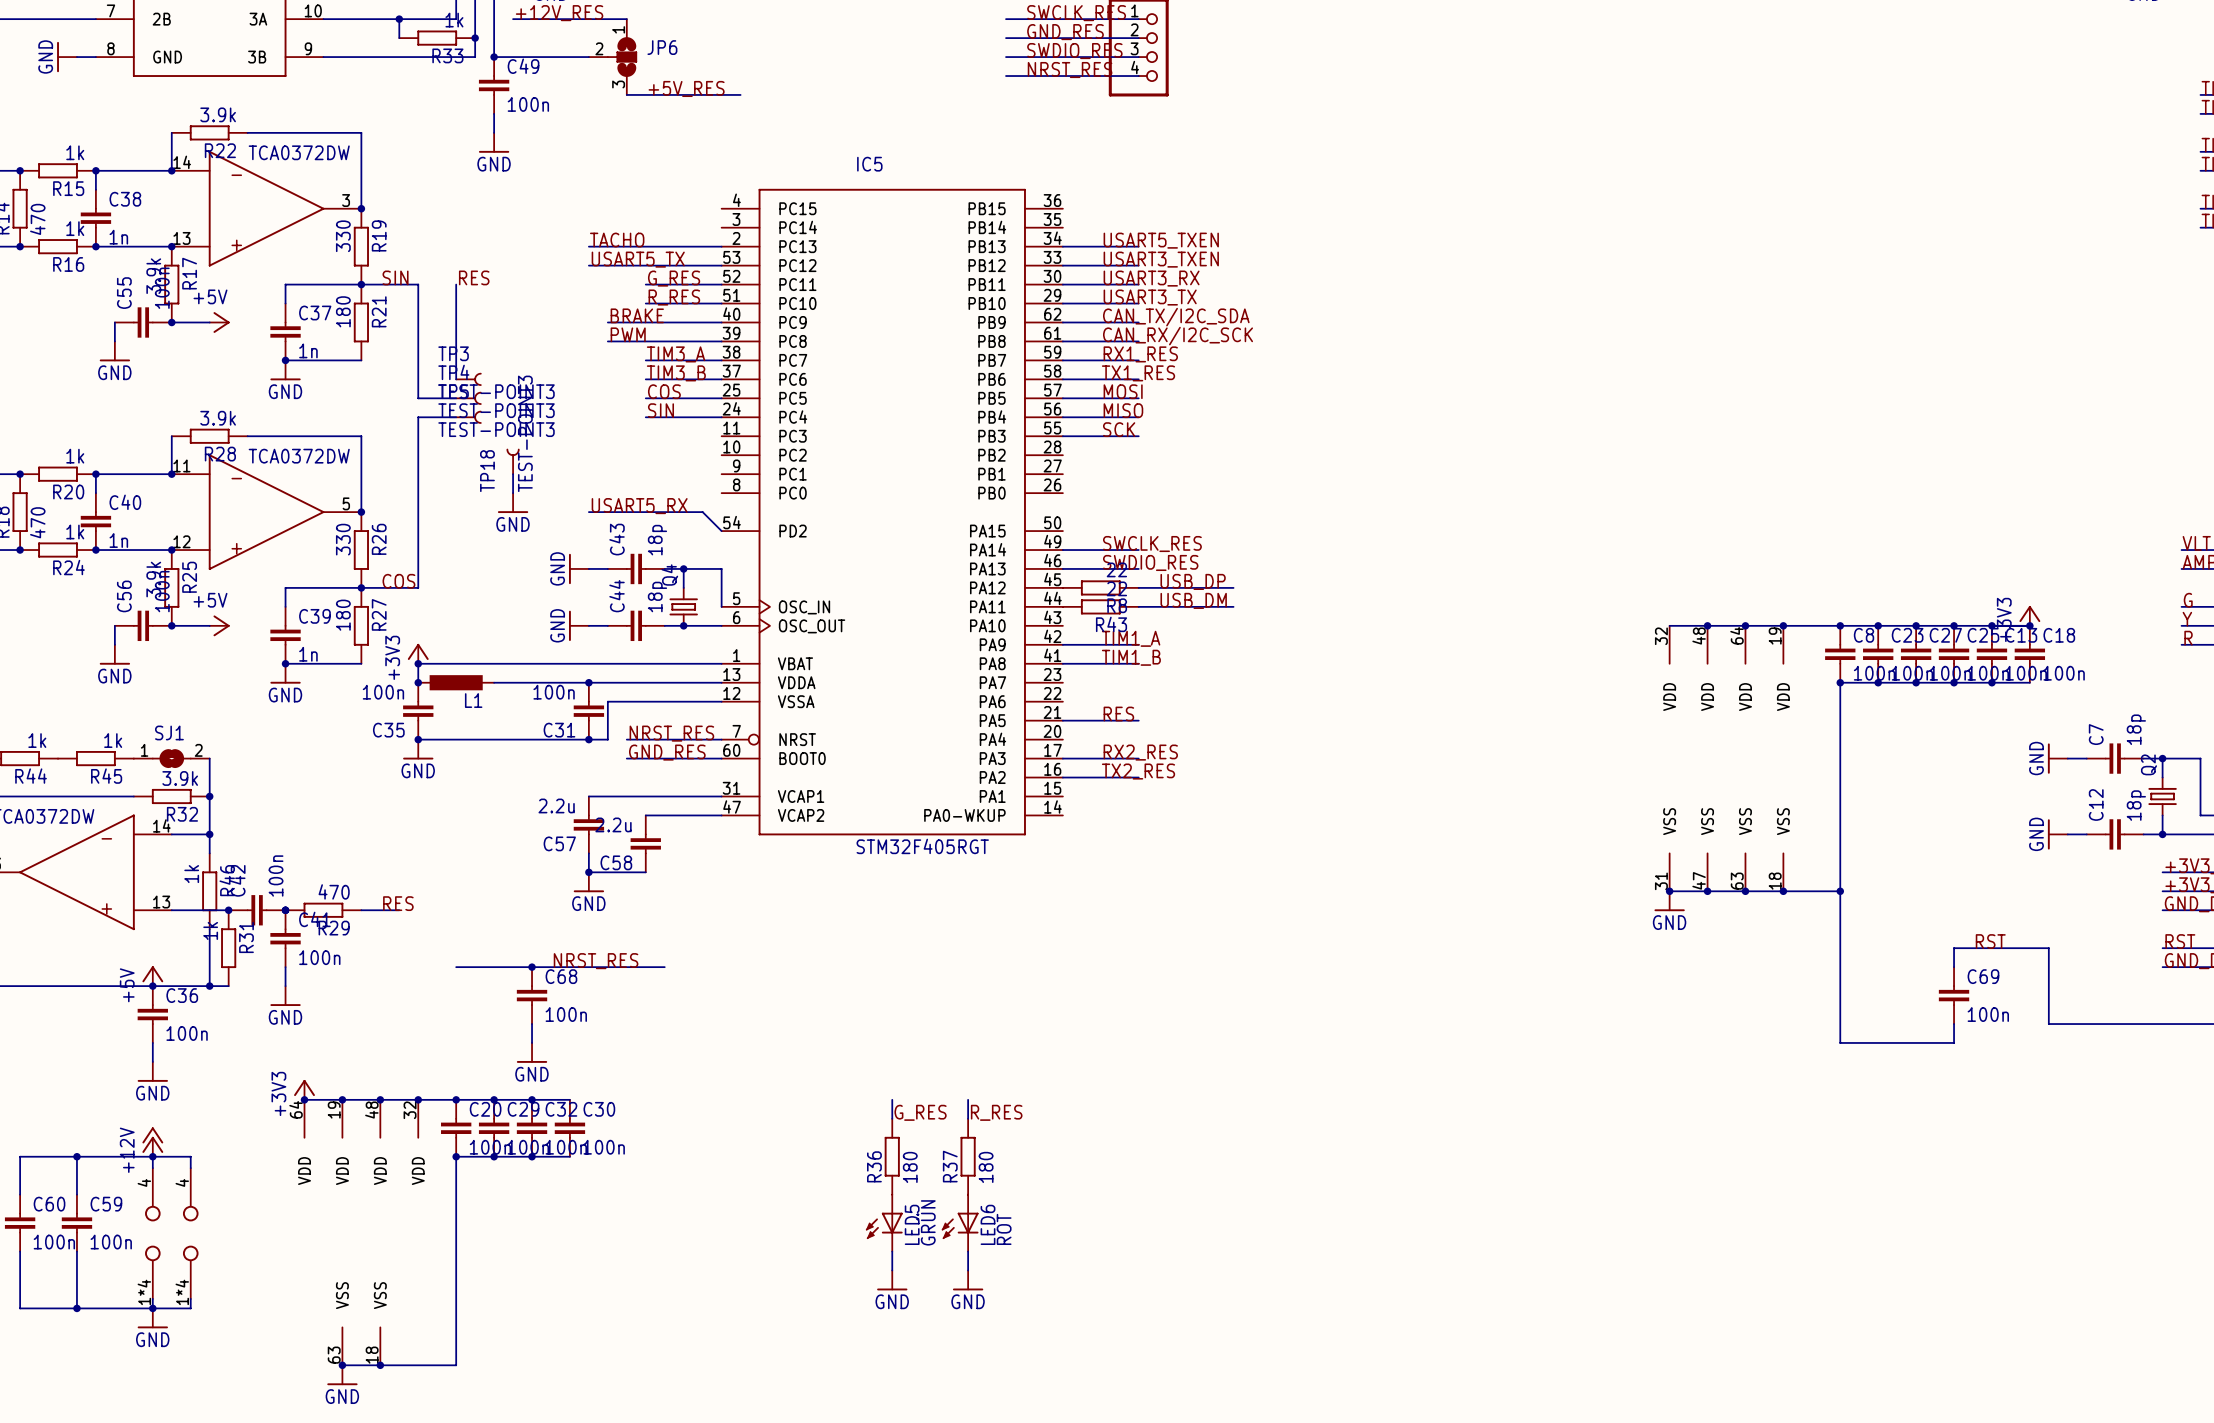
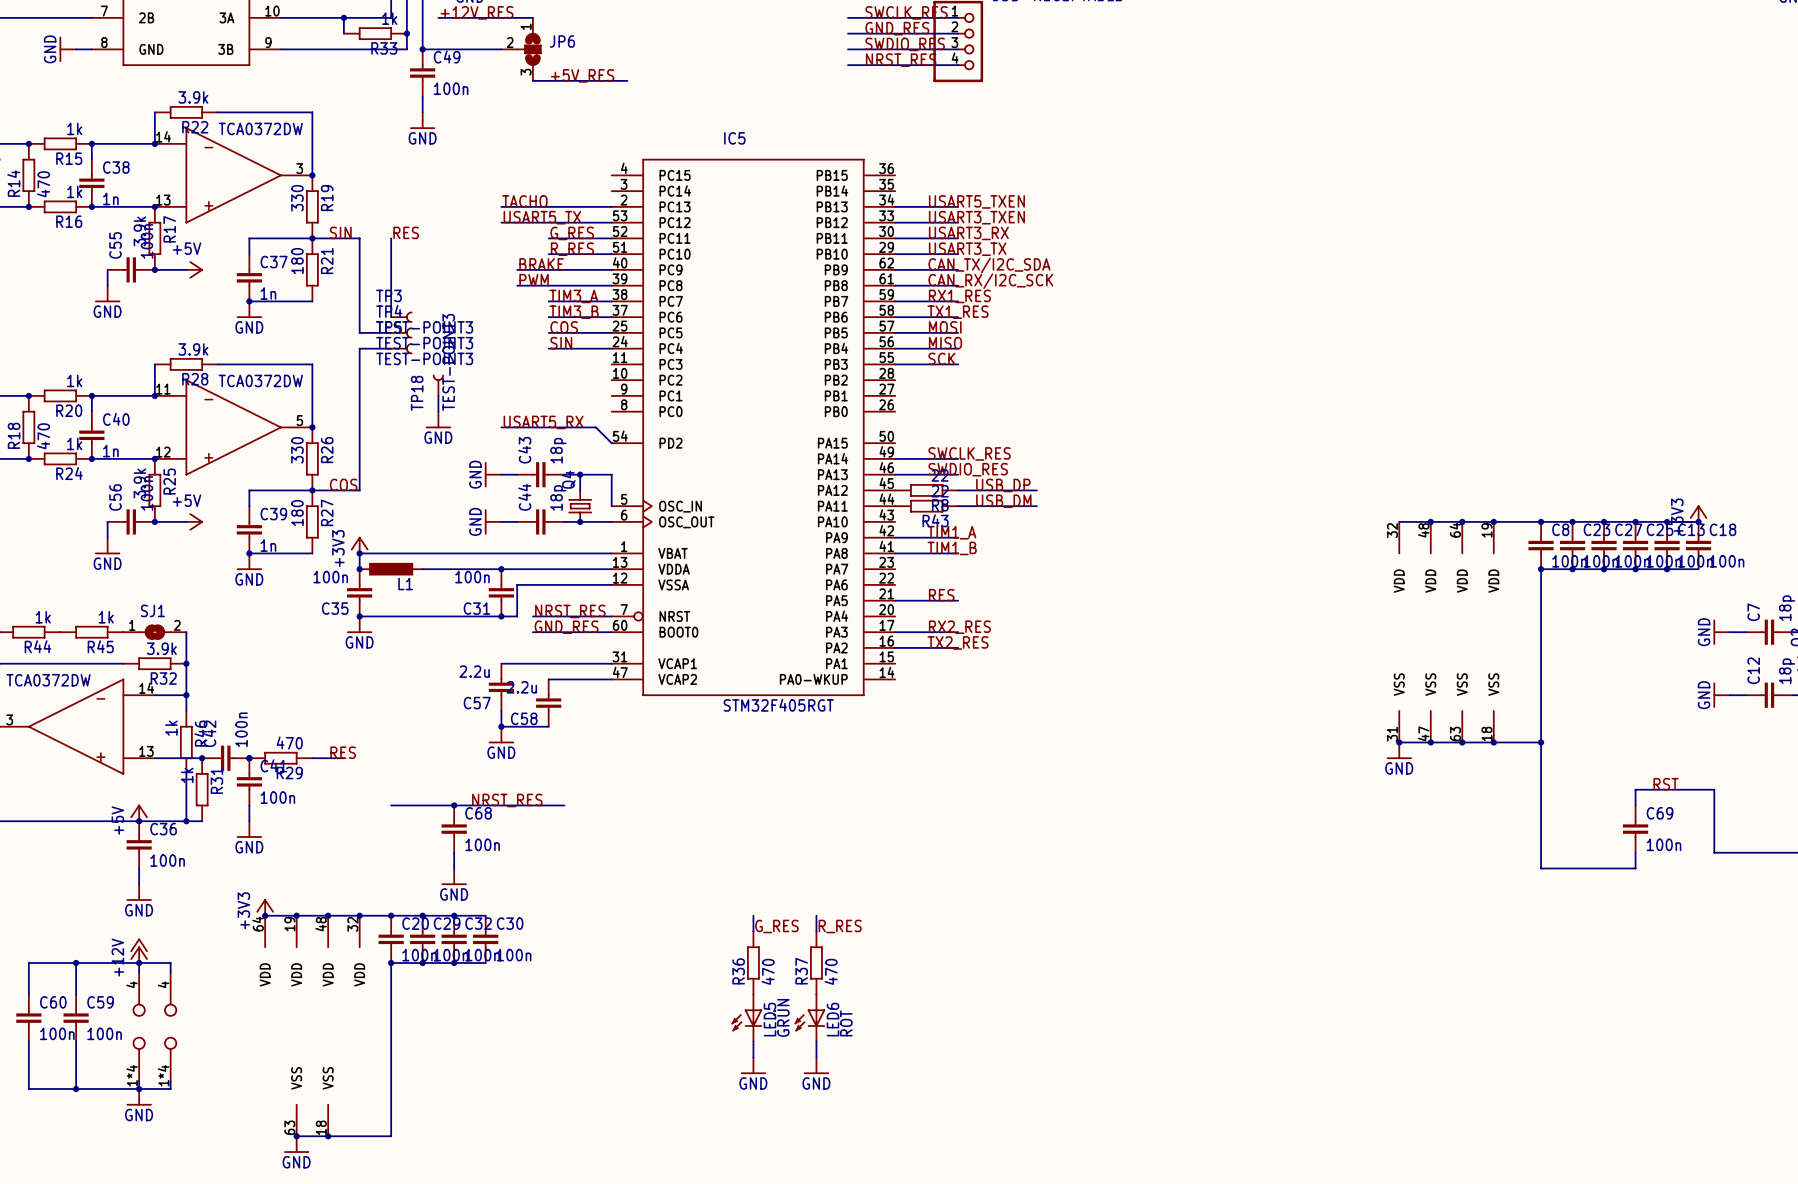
R36 value: 180 (910, 1167) -> 470 (768, 971)
R37 value: 180 (986, 1167) -> 470 (831, 971)

